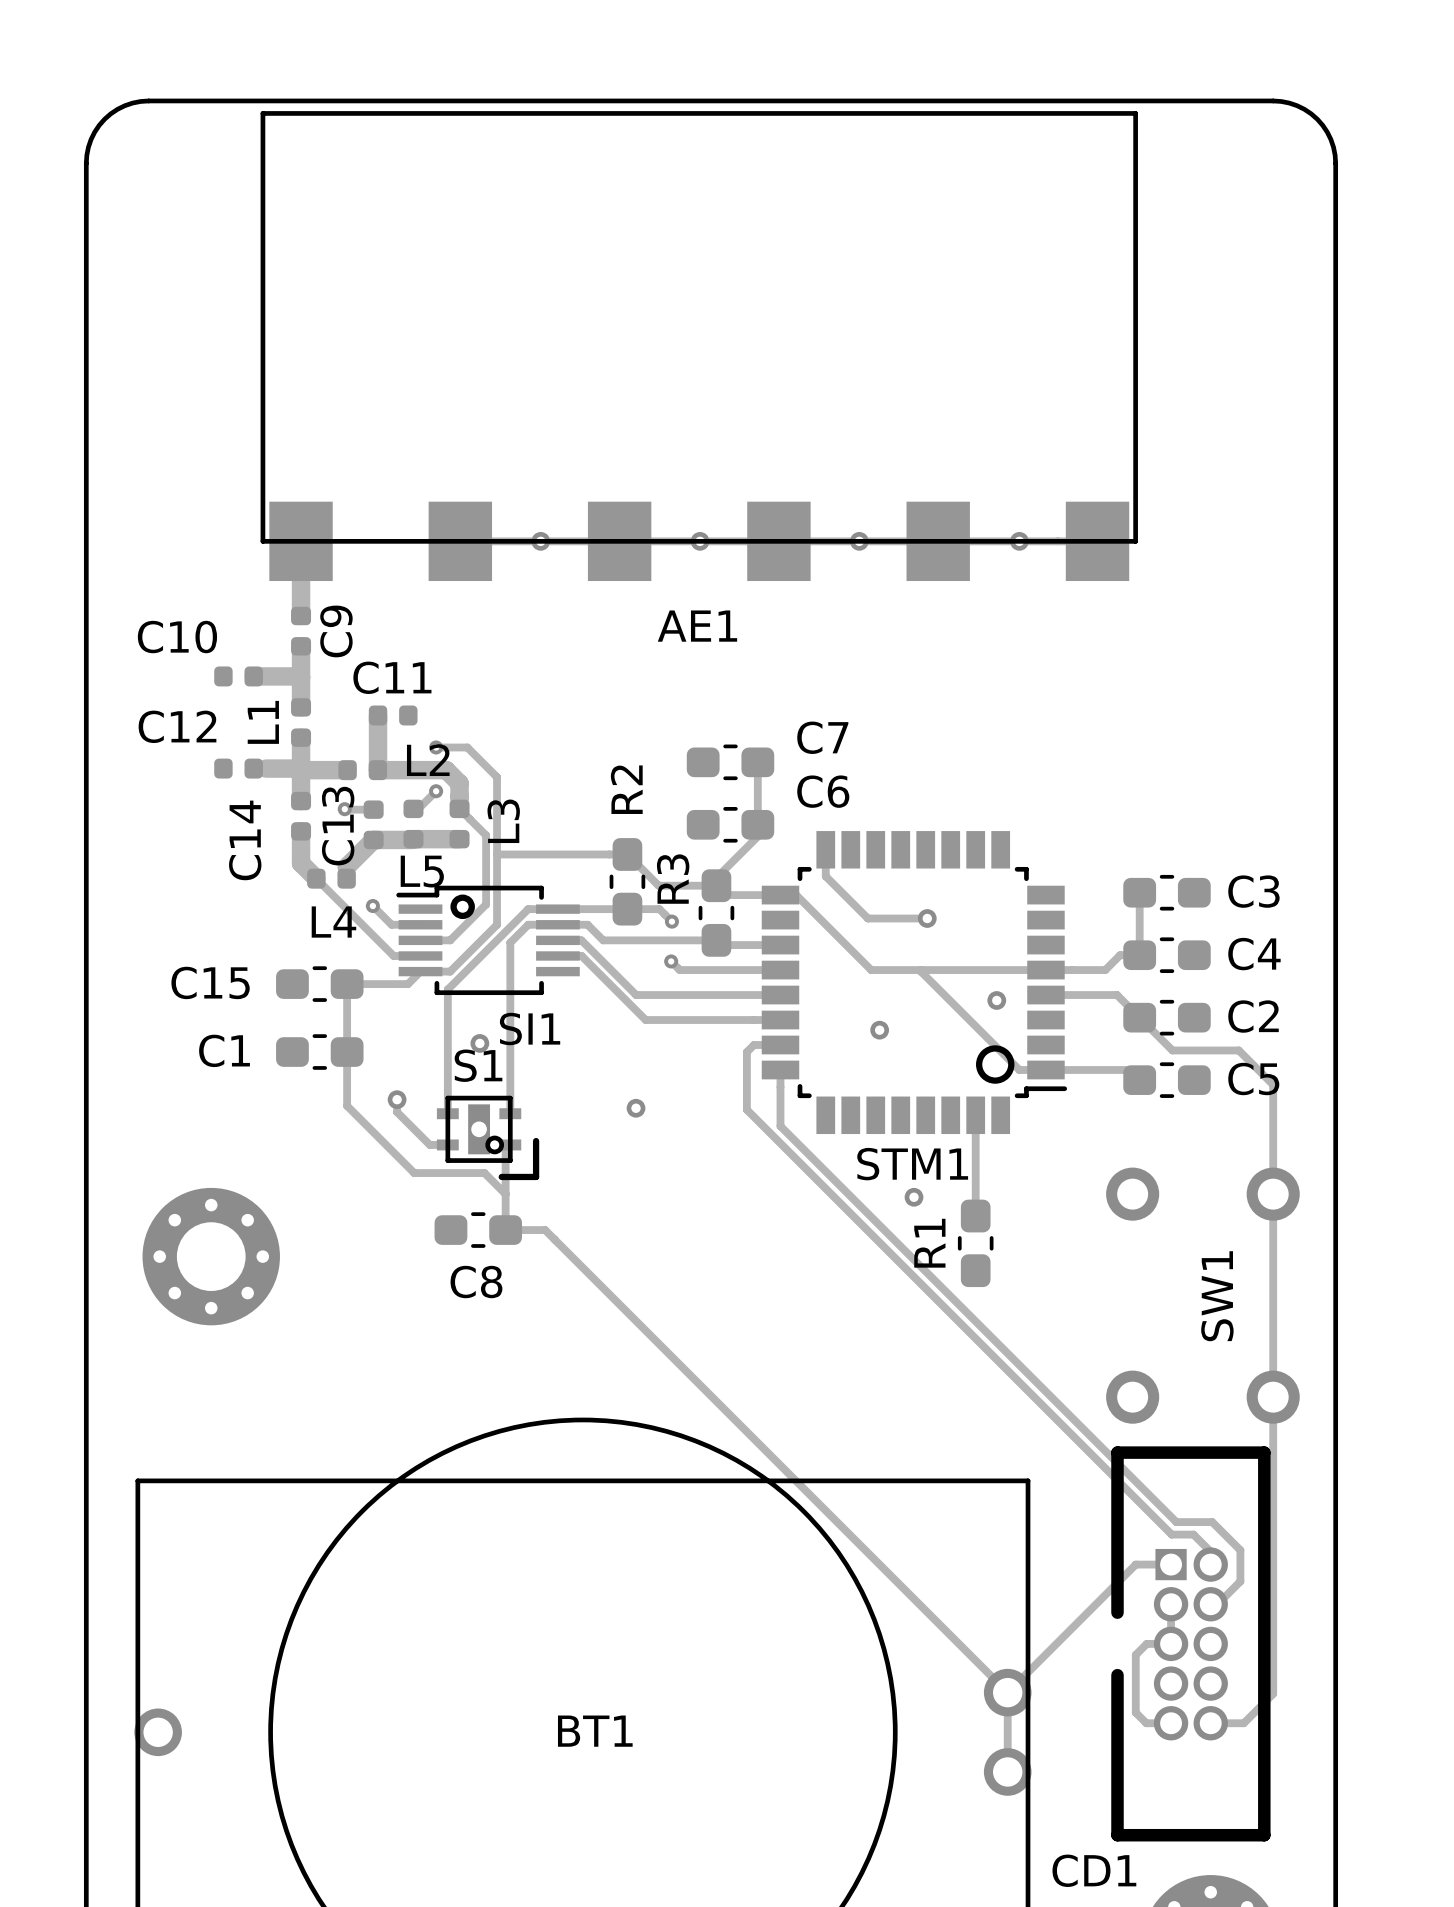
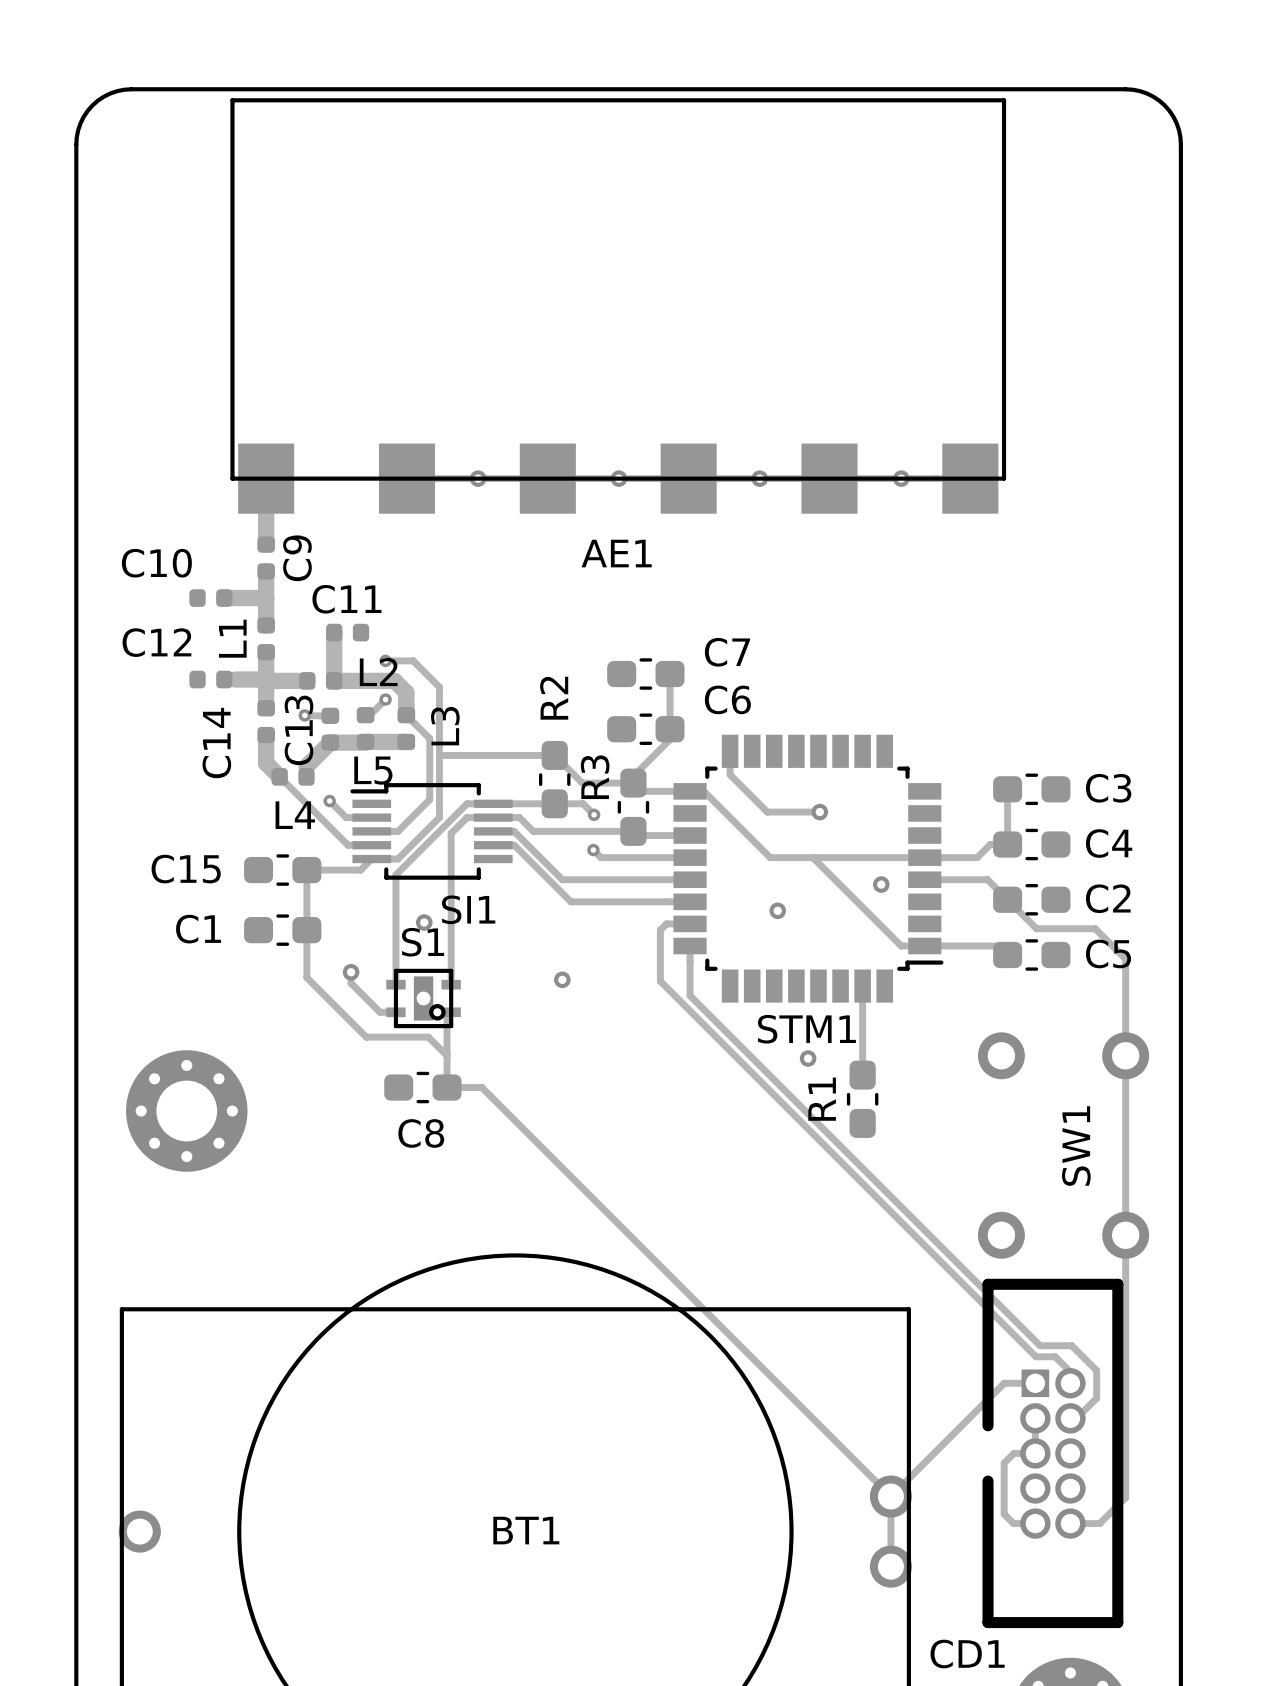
drawing: [450, 894, 475, 920] -> none
drawing: [976, 1045, 1015, 1084] -> none
line: (536, 1141) (536, 1176) (501, 1176) -> none

